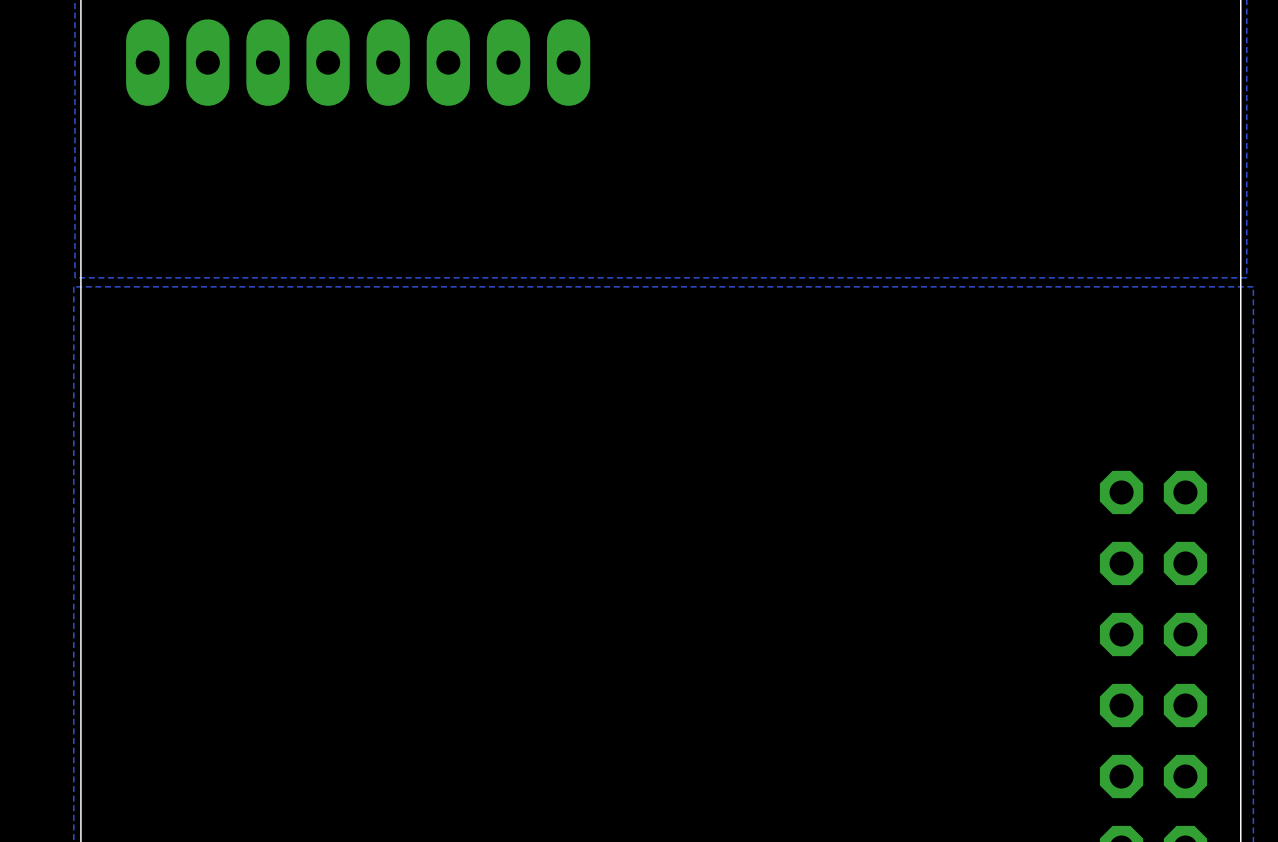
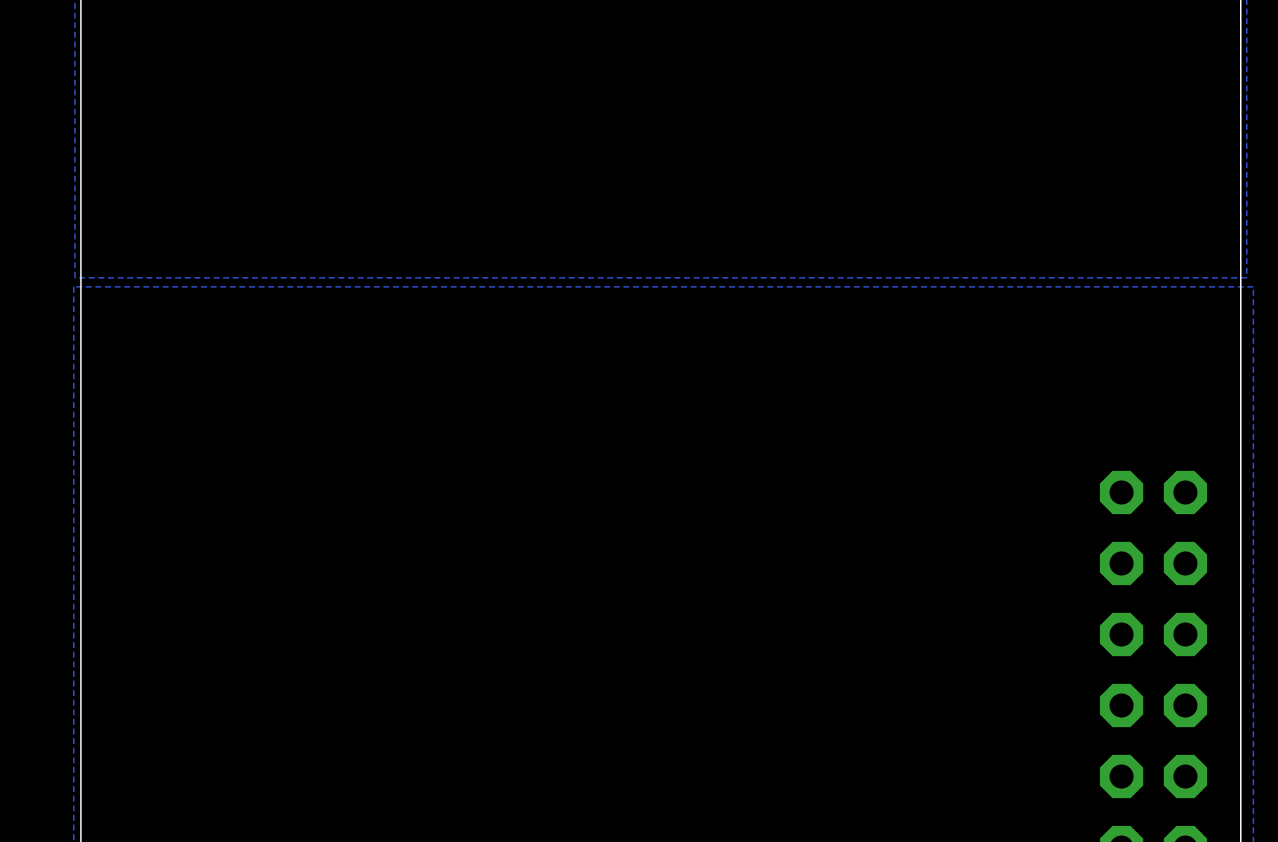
part: (358, 62) -> none

